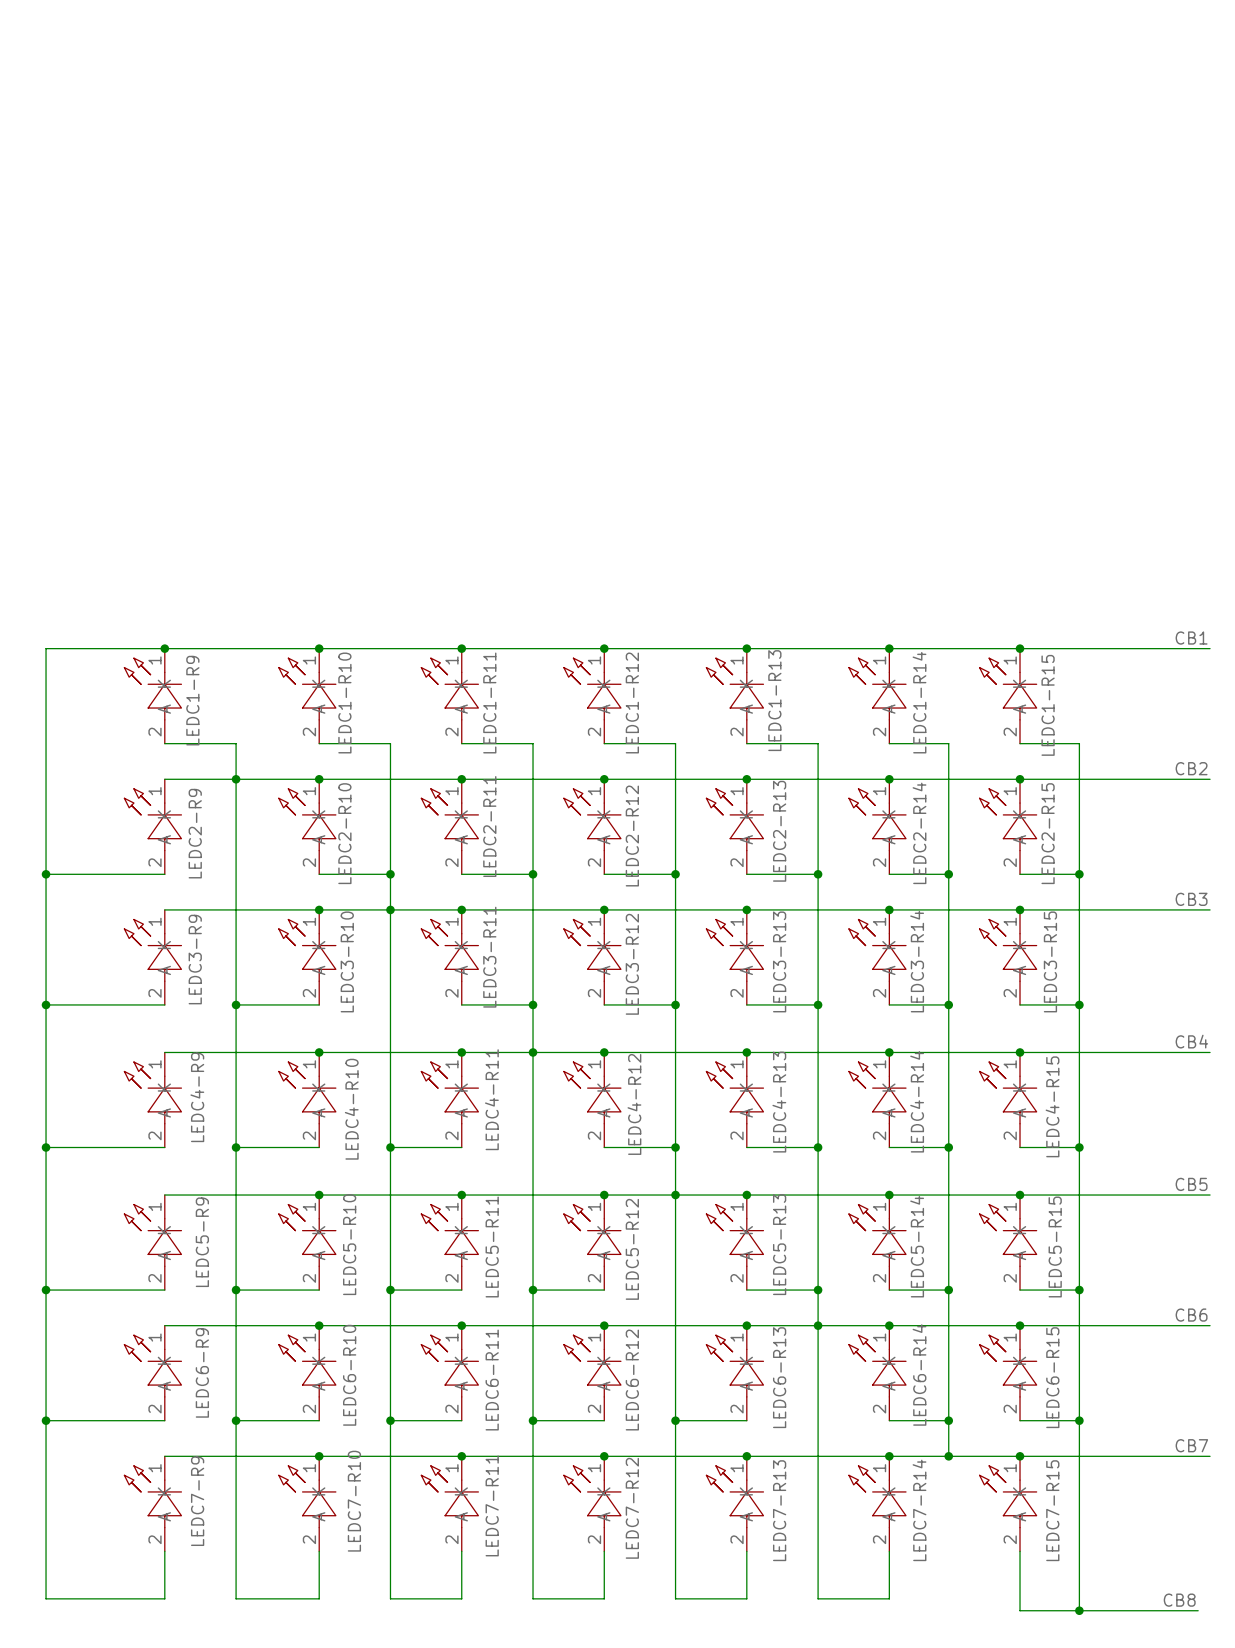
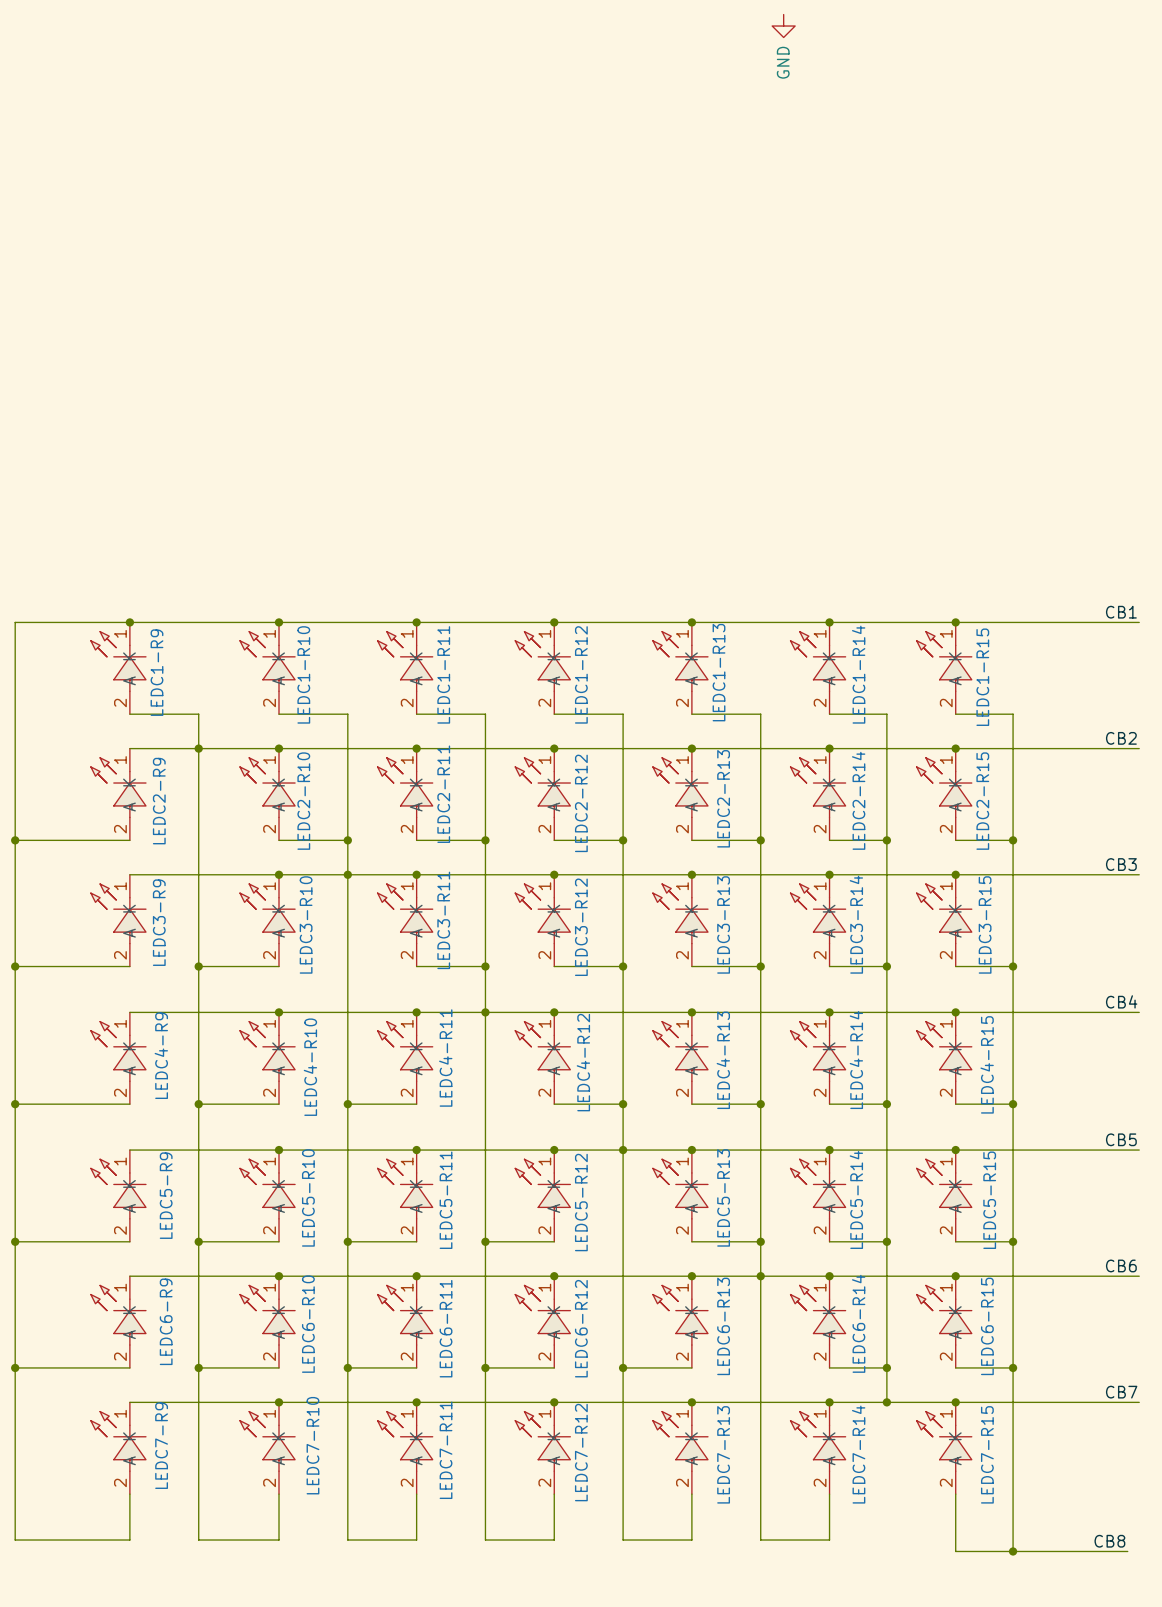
power symbol: none -> GND (783, 26)

